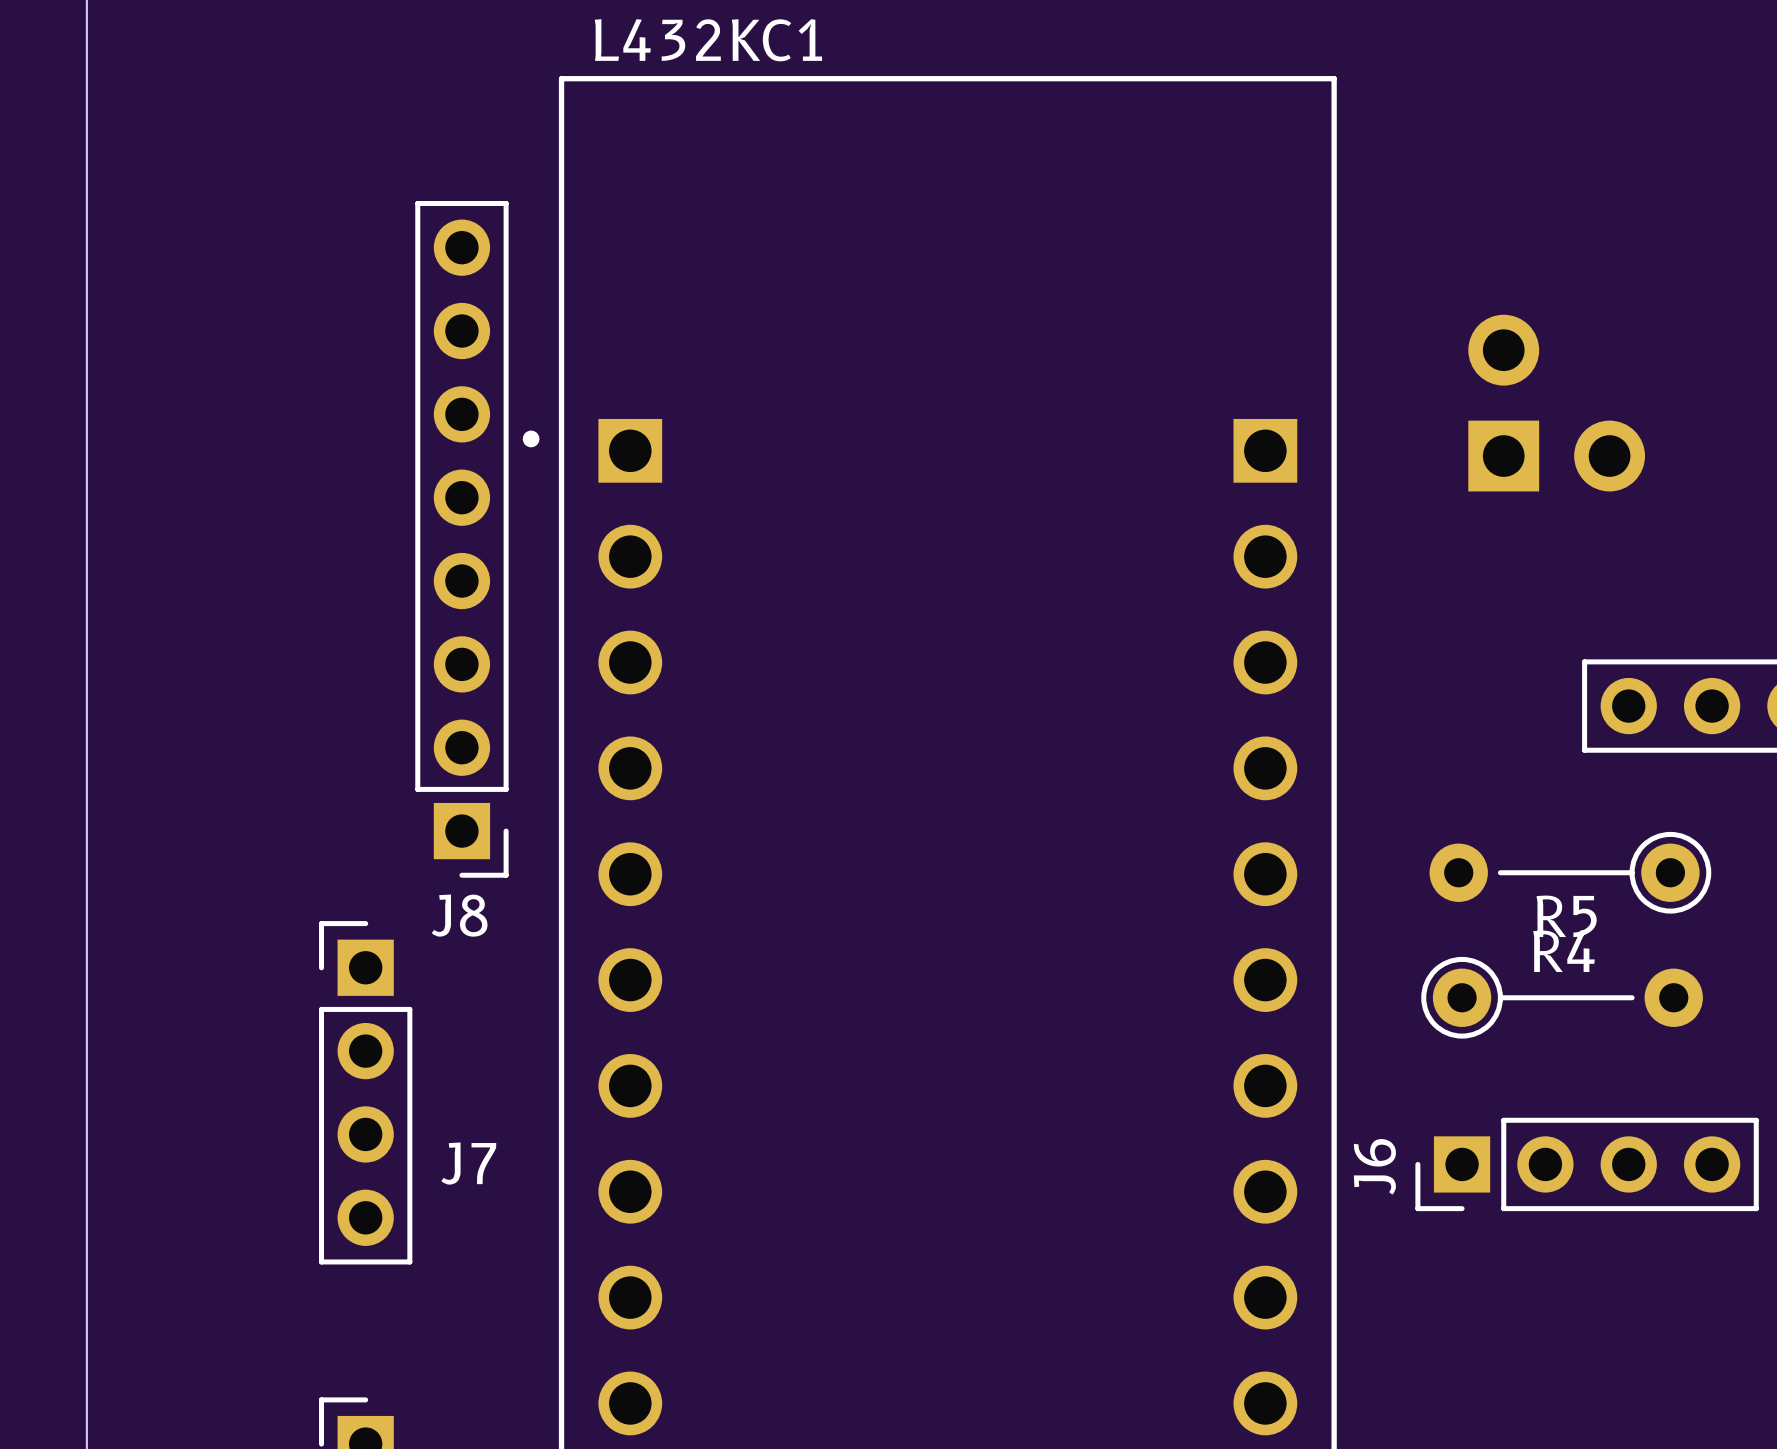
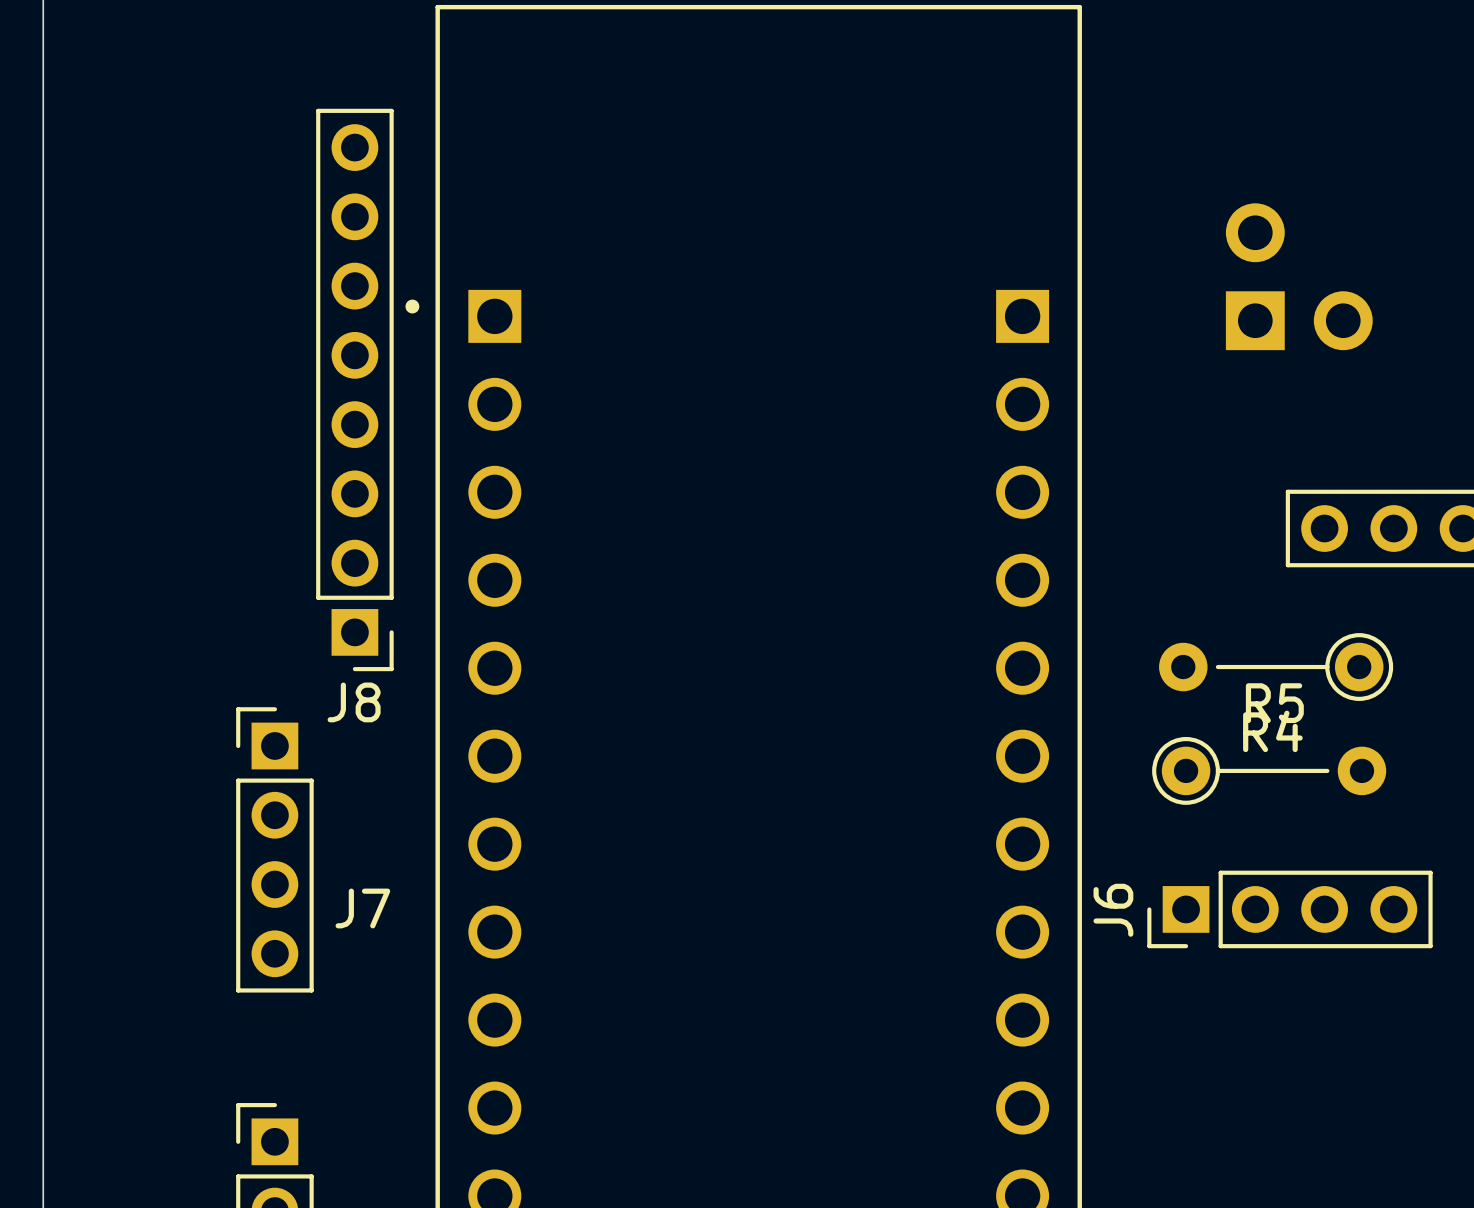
part position: (1556, 403) -> (1299, 276)

